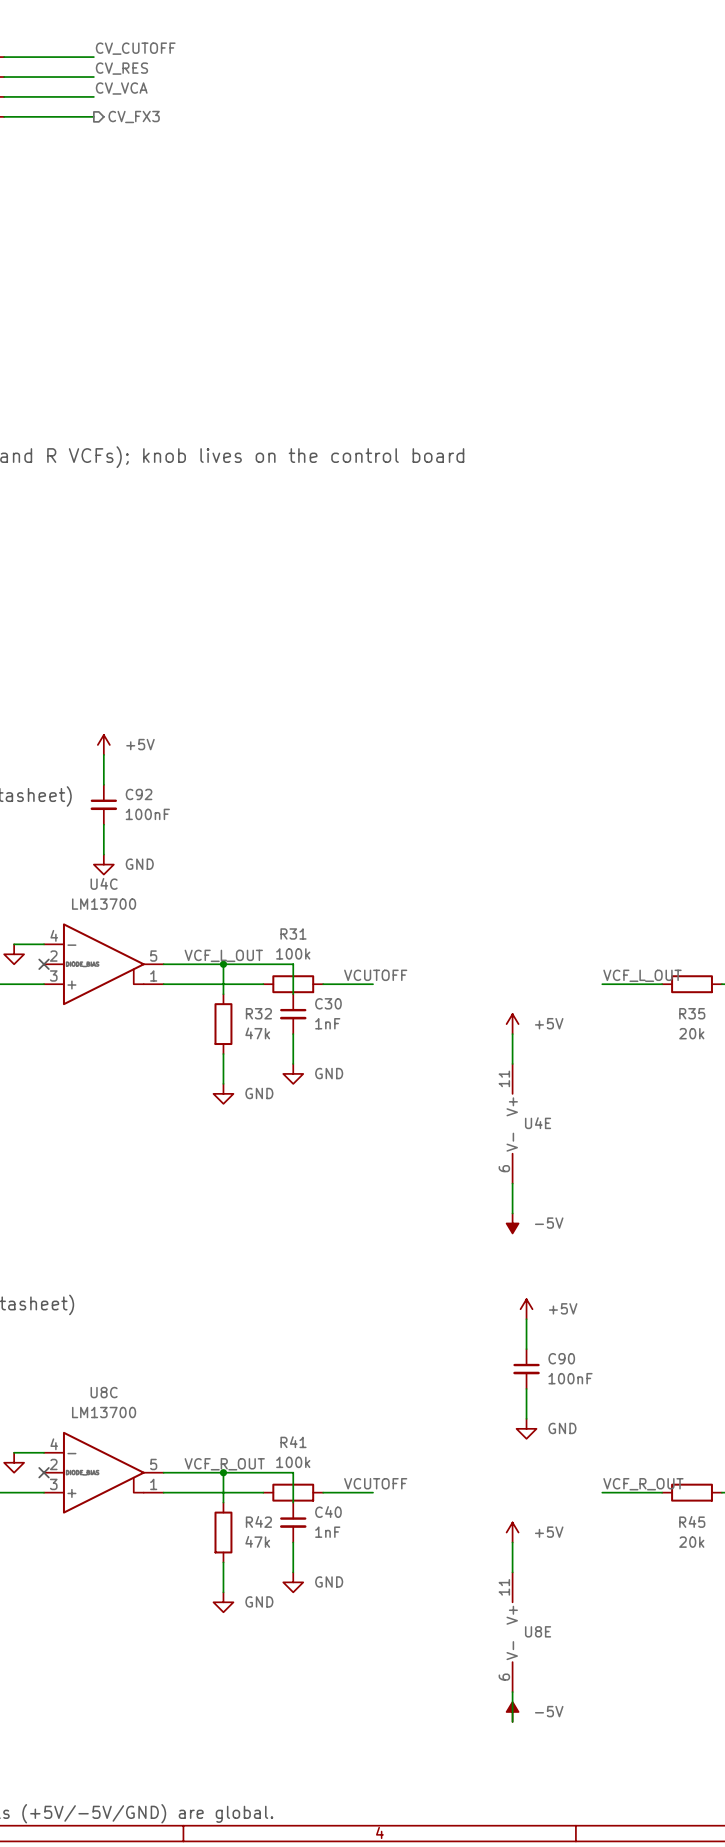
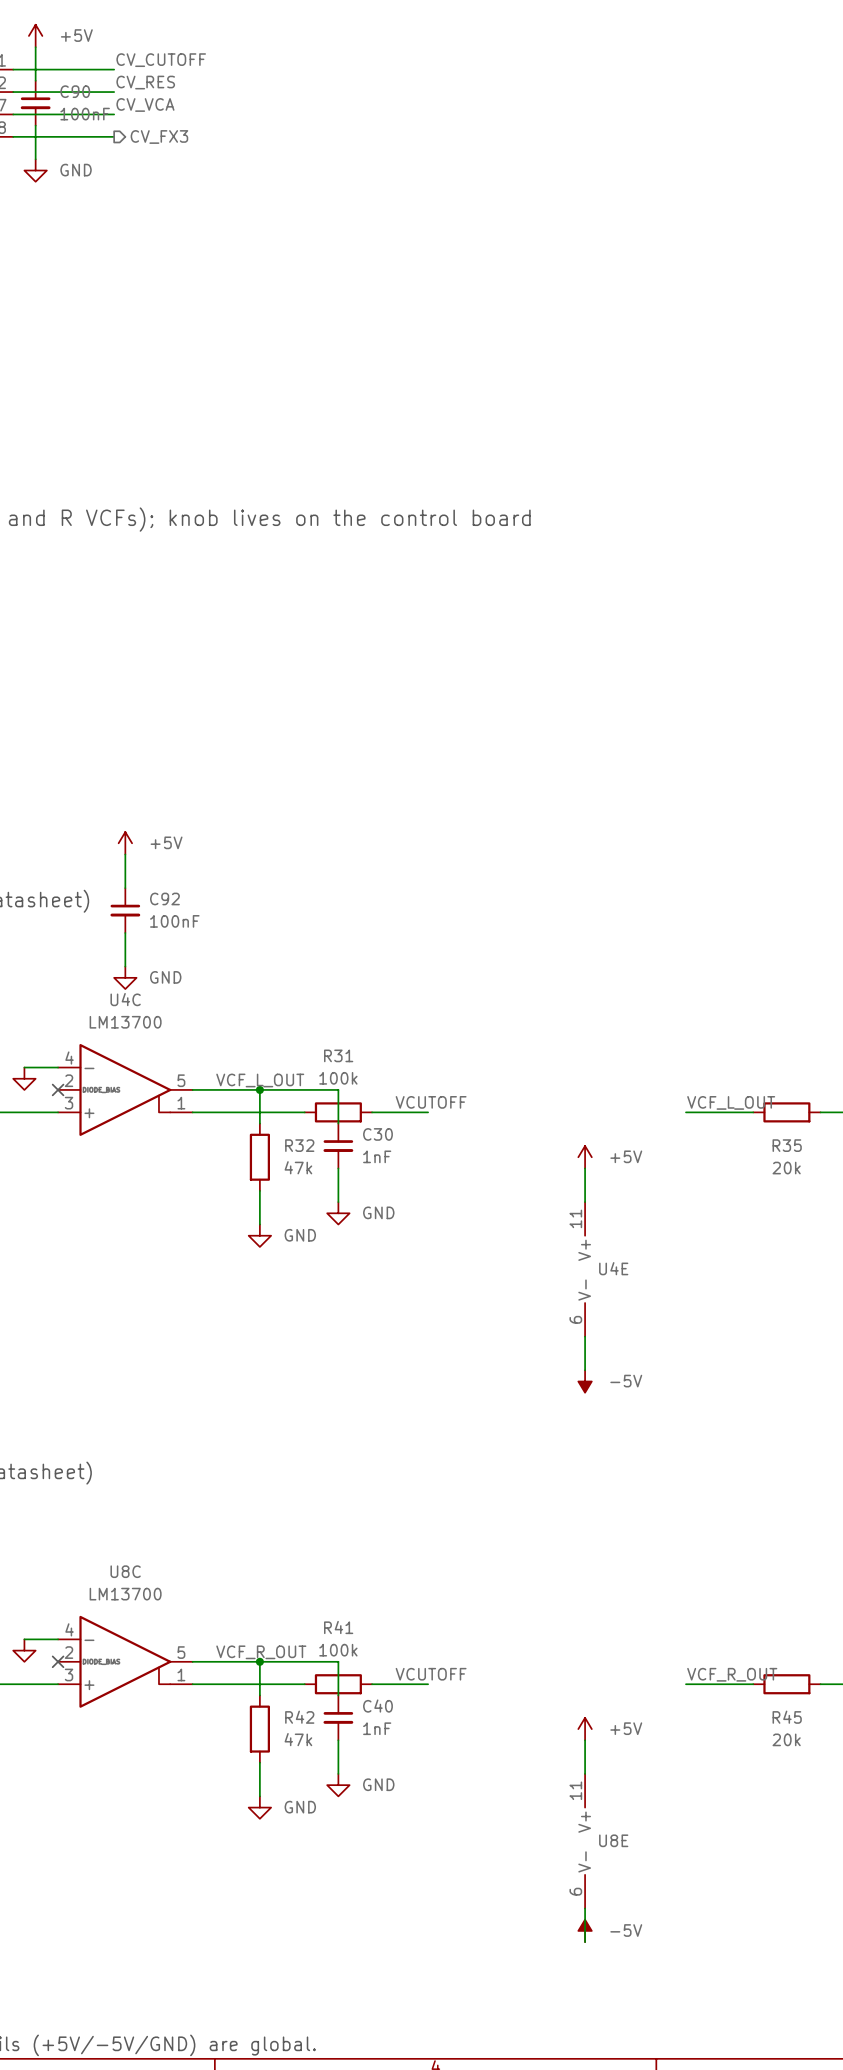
power symbol: none -> +5V (35, 35)
wire: none -> (35, 47) (35, 80)
wire: none -> (35, 125) (35, 159)
power symbol: none -> GND (35, 170)
power symbol: +5V (526, 1309) -> none
wire: (526, 1319) (526, 1349) -> none
C90 position: (526, 1369) -> (35, 103)
wire: (526, 1388) (526, 1418) -> none
power symbol: GND (526, 1428) -> none

